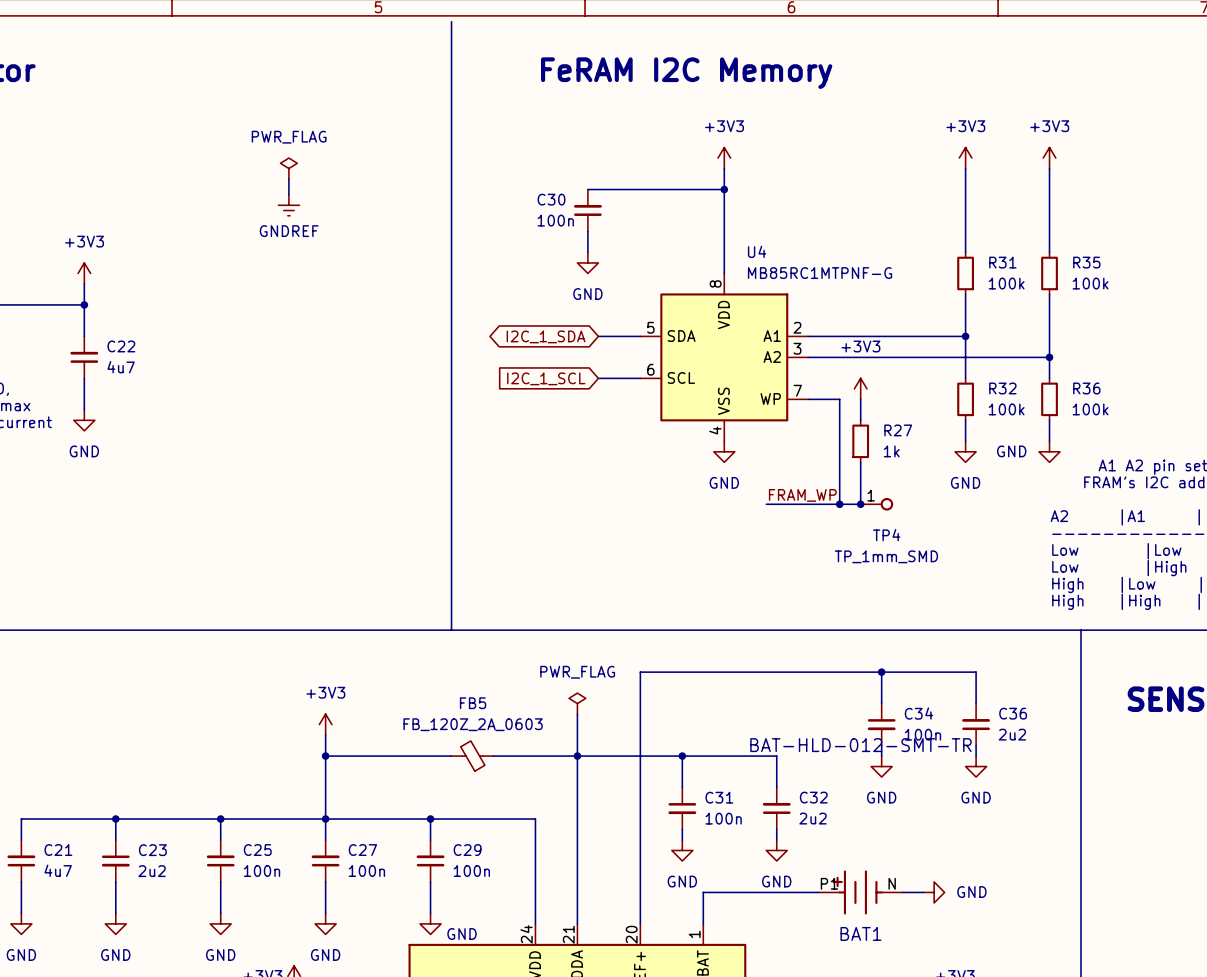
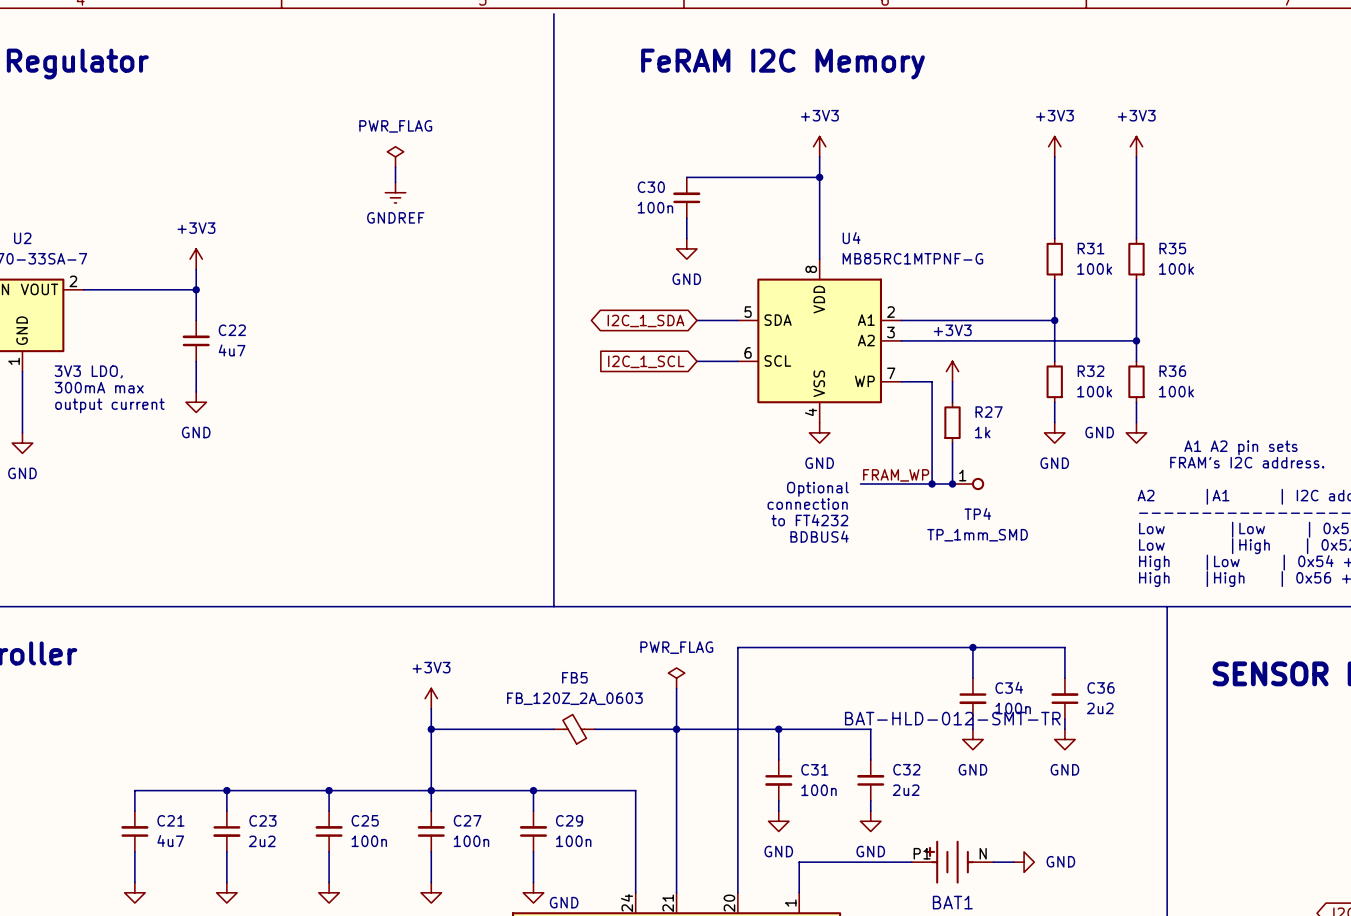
text: none -> Optional (817, 489)
text: none -> connection (807, 504)
text: none -> to FT4232 (809, 520)
text: none -> BDBUS4 (819, 536)

